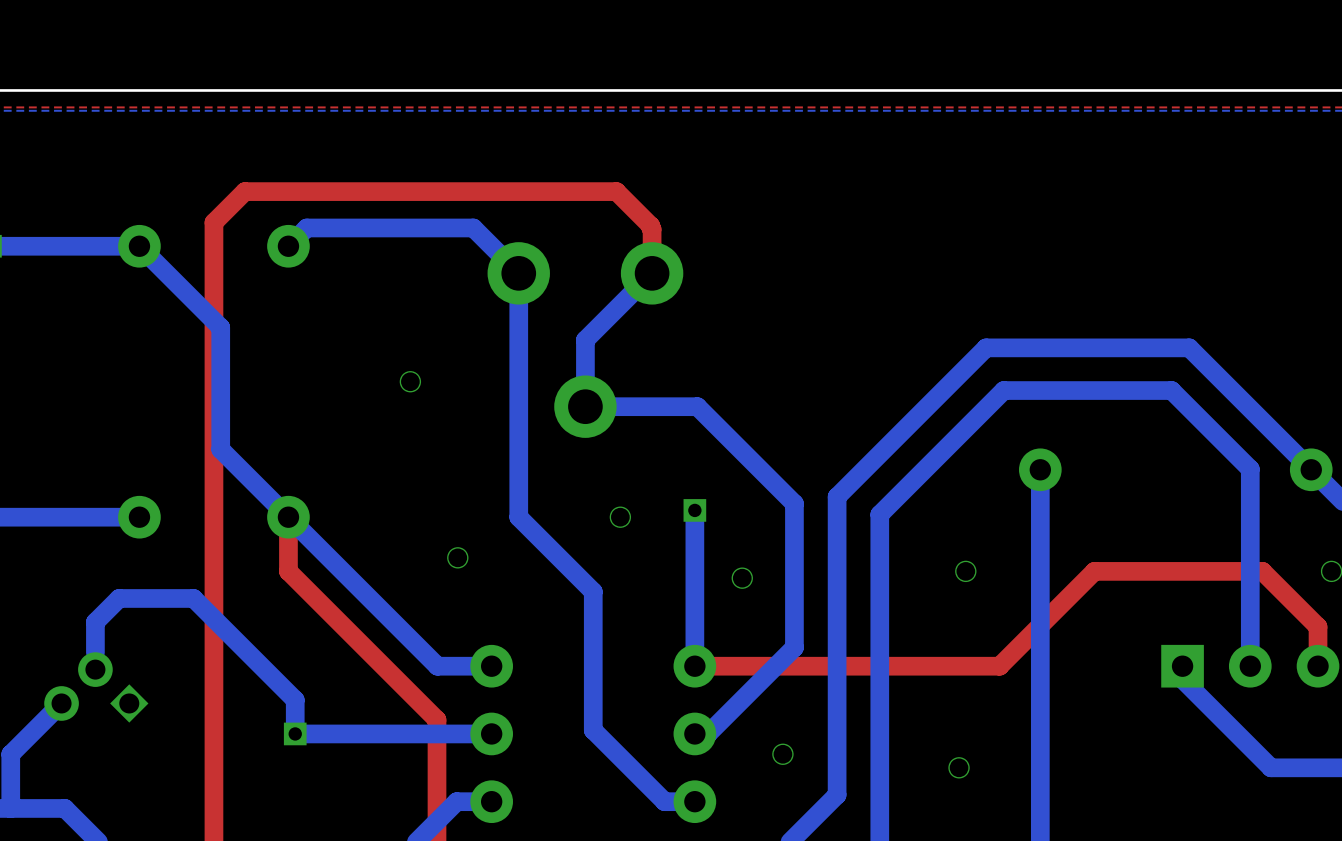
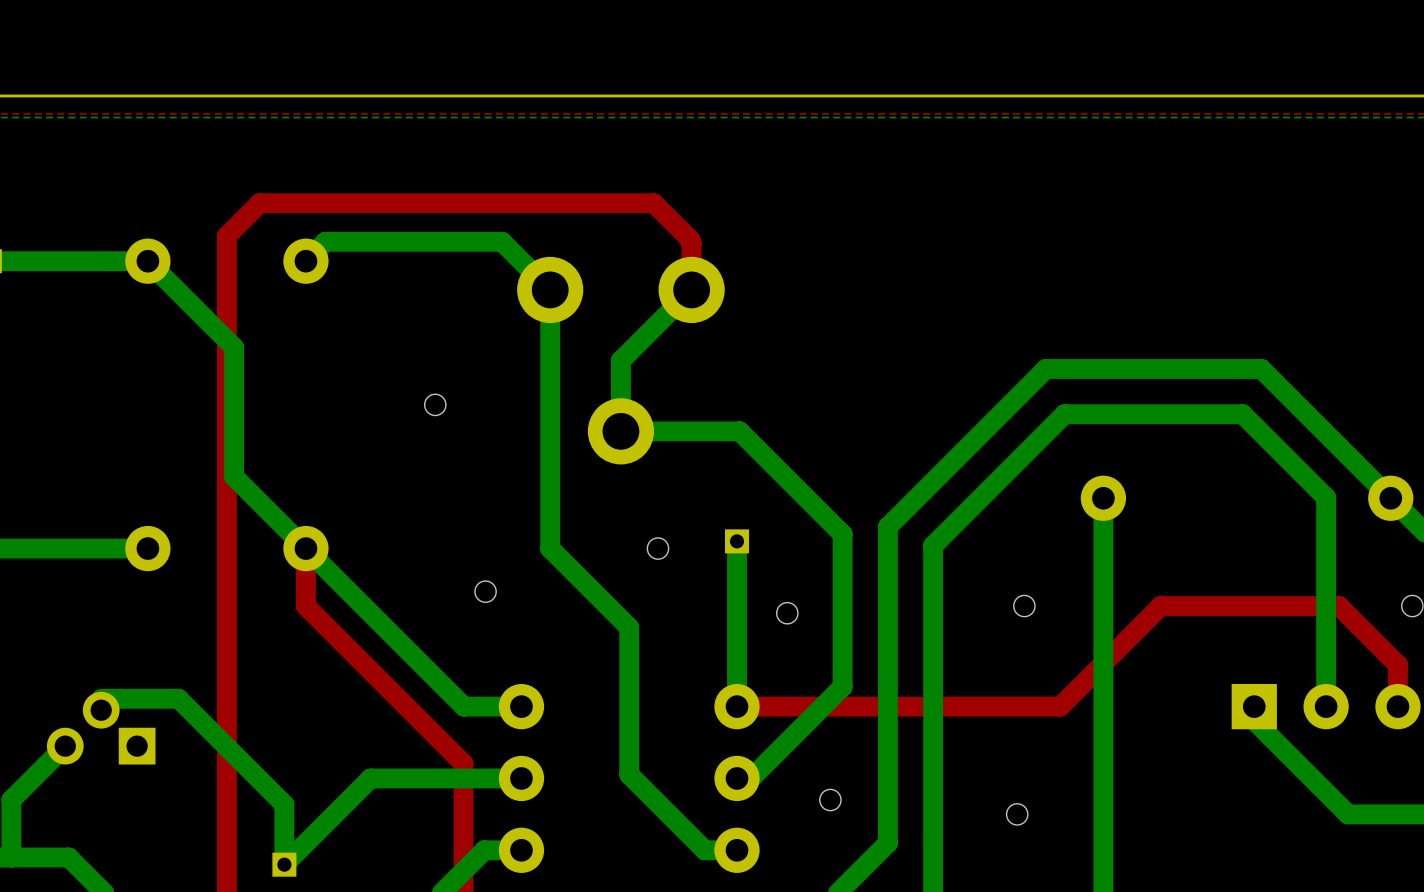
part footprint: [44, 652, 149, 723] -> [46, 691, 156, 765]
bottom track: (95, 652) (95, 622) (119, 598) (193, 598) (295, 700) (295, 733) (349, 733) -> (101, 698) (178, 698) (284, 804) (284, 864) (370, 778)
part position: (295, 733) -> (284, 864)

